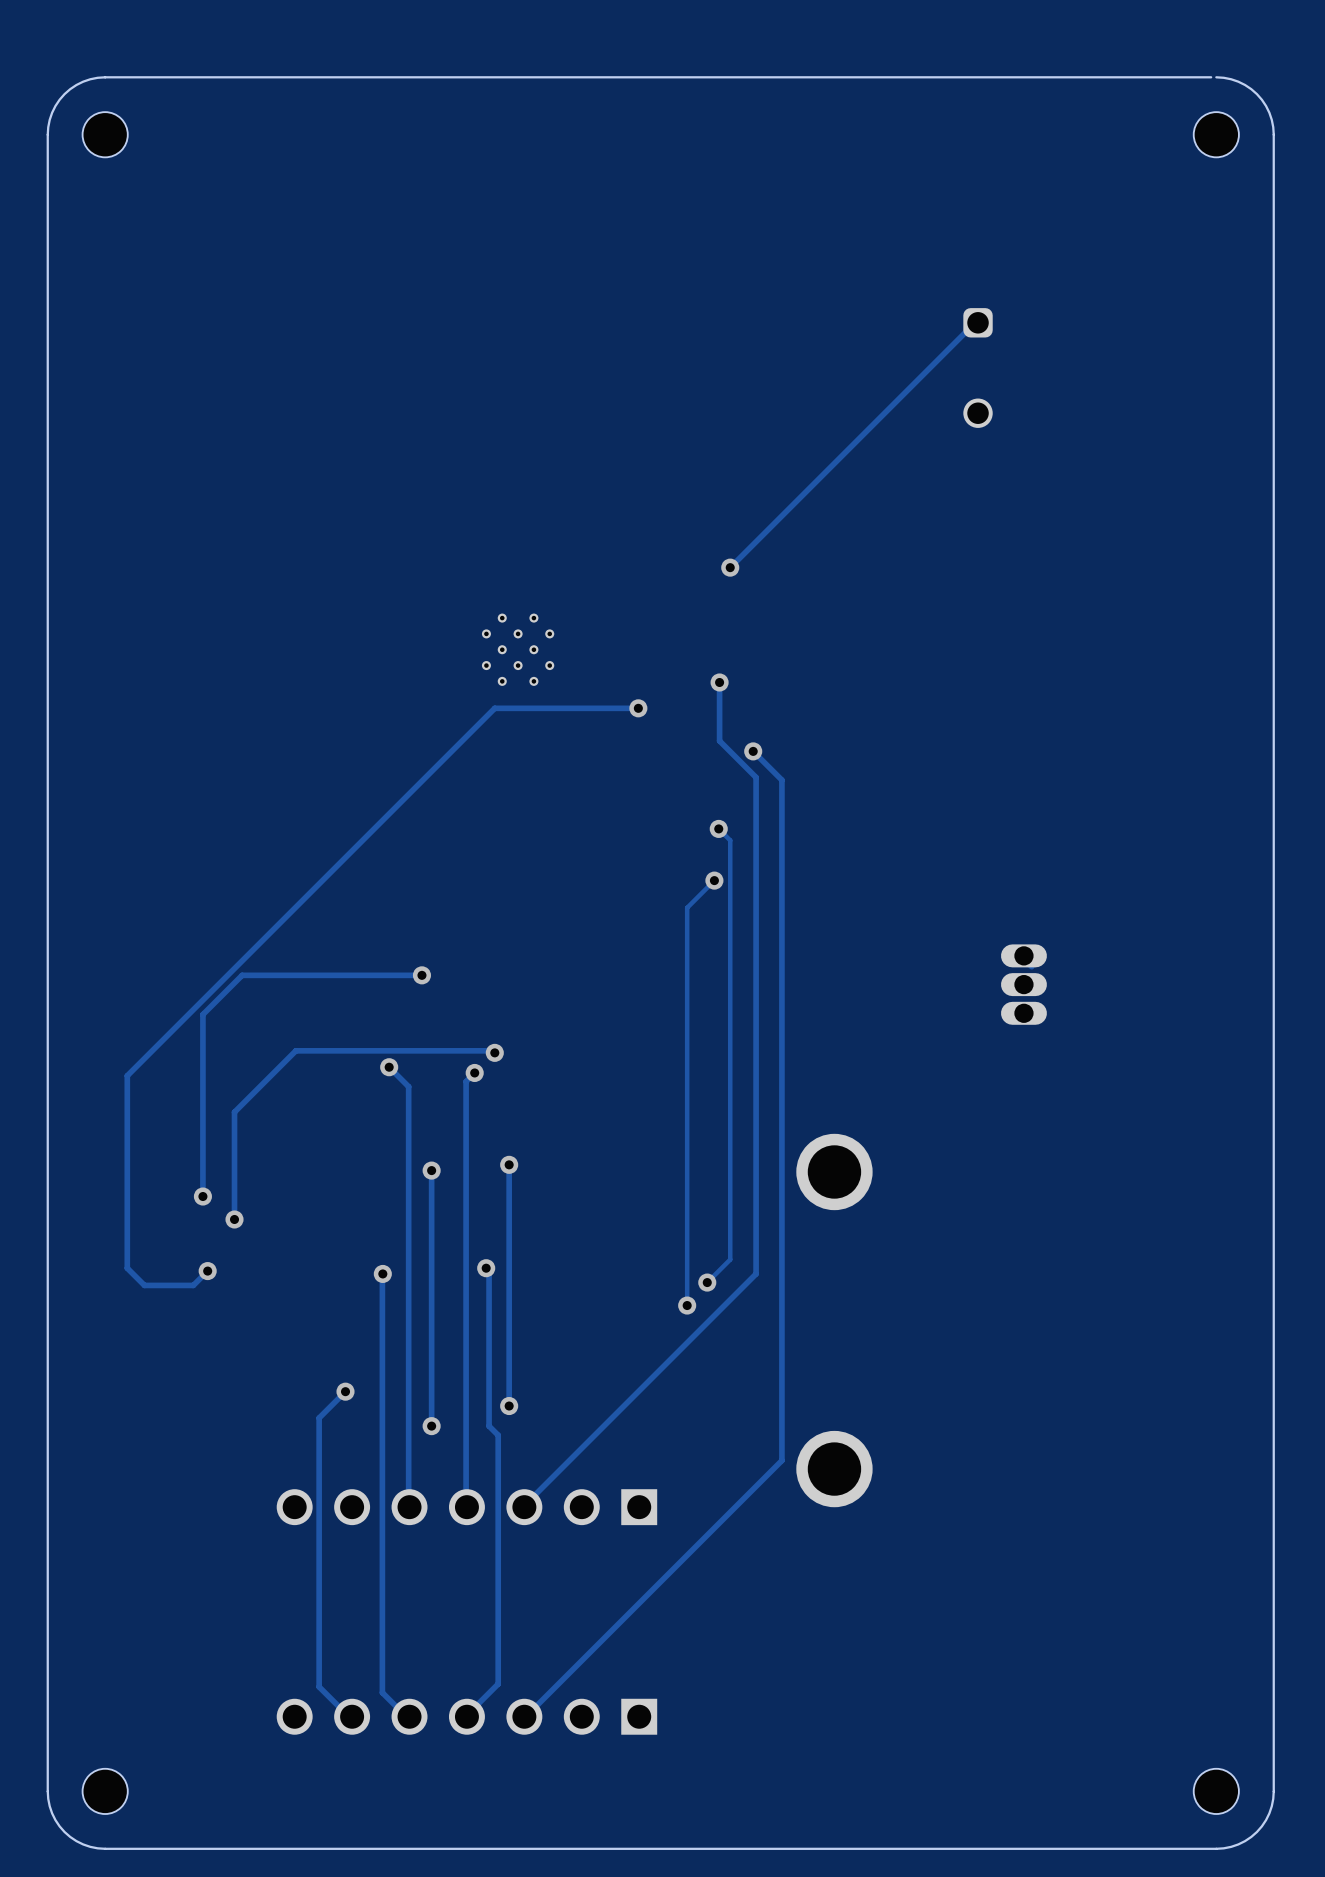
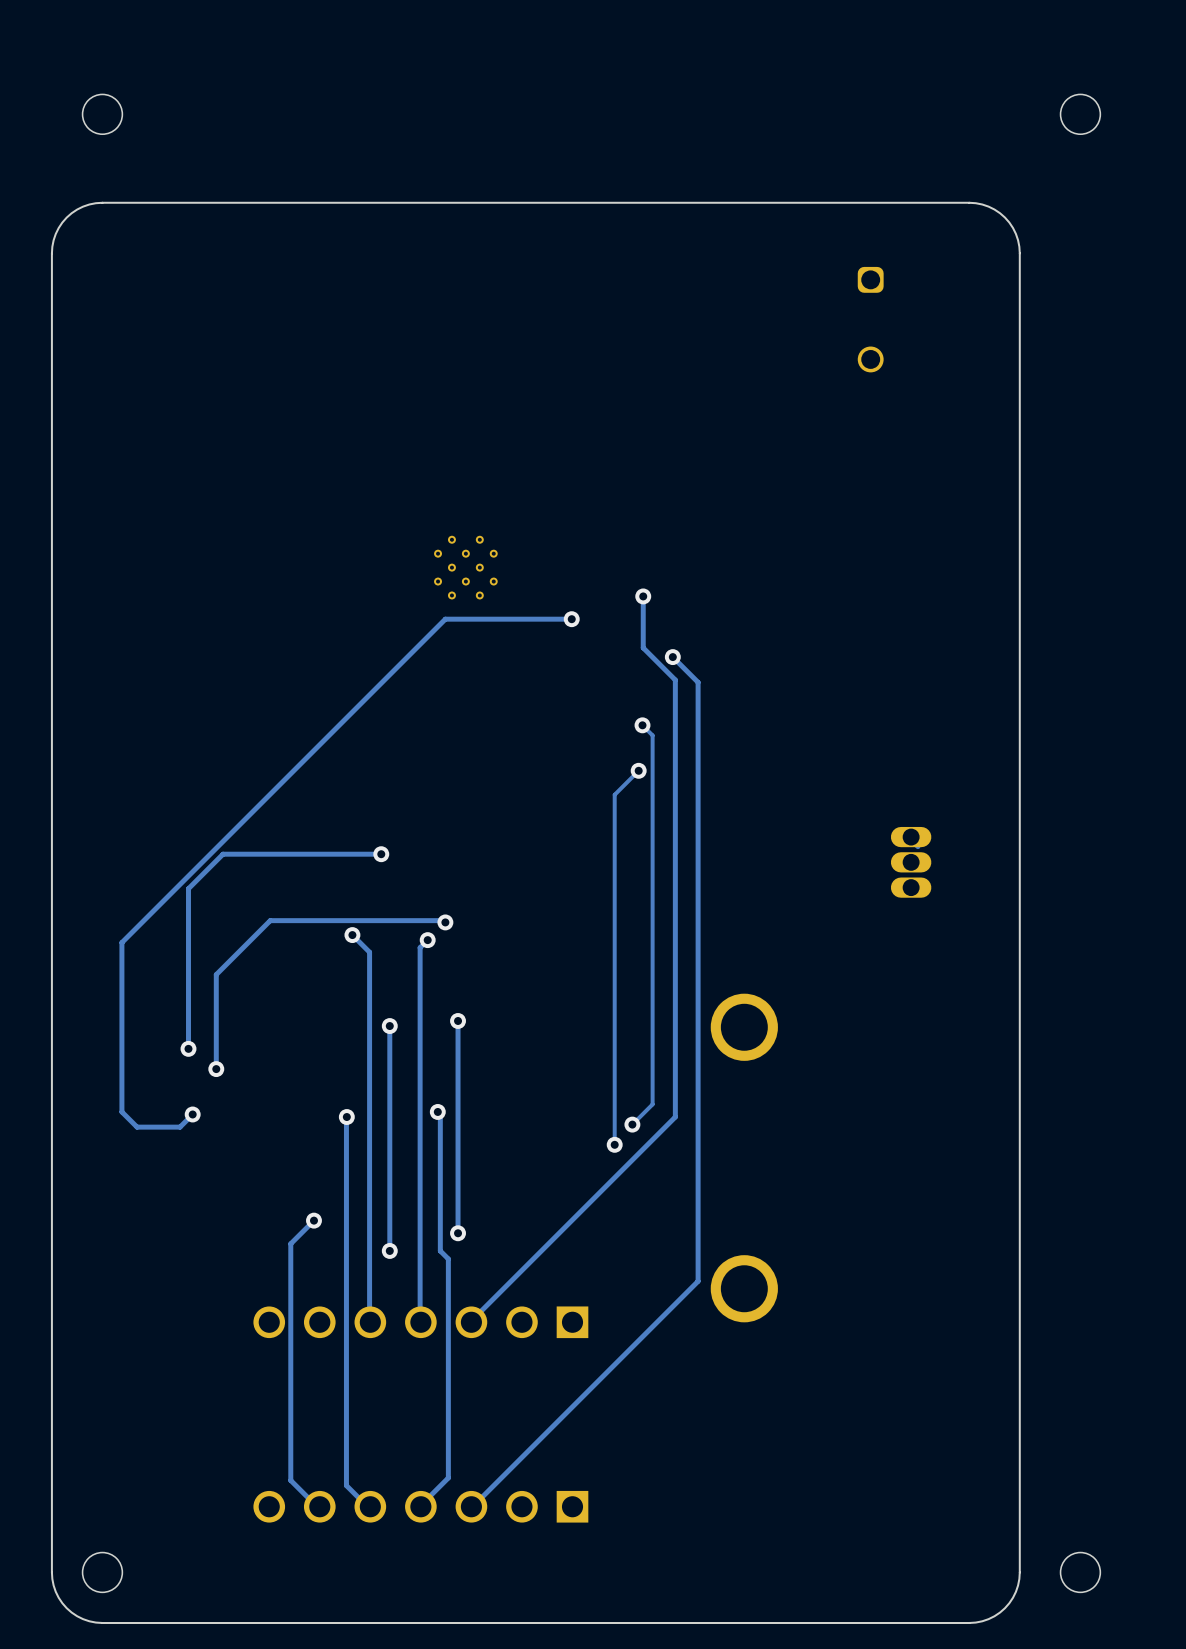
board edge: (1211, 77) (97, 77) (83, 81) (70, 89) (55, 106) (49, 119) (47, 134) (47, 292) -> none
board edge: (1216, 77) (1238, 81) (1256, 94) (1269, 112) (1273, 134) (1273, 1798) (1269, 1813) (1261, 1826) (1245, 1841) (1231, 1846) (1216, 1848) (1089, 1848) -> (51, 253) (55, 233) (66, 217) (83, 206) (102, 202) (969, 202) (988, 206) (1000, 213) (1009, 222) (1018, 240) (1019, 253) (1019, 1572) (1015, 1591) (1004, 1608) (988, 1619) (969, 1623)
track: (977, 322) (728, 569) -> none
via: (730, 567) -> none

